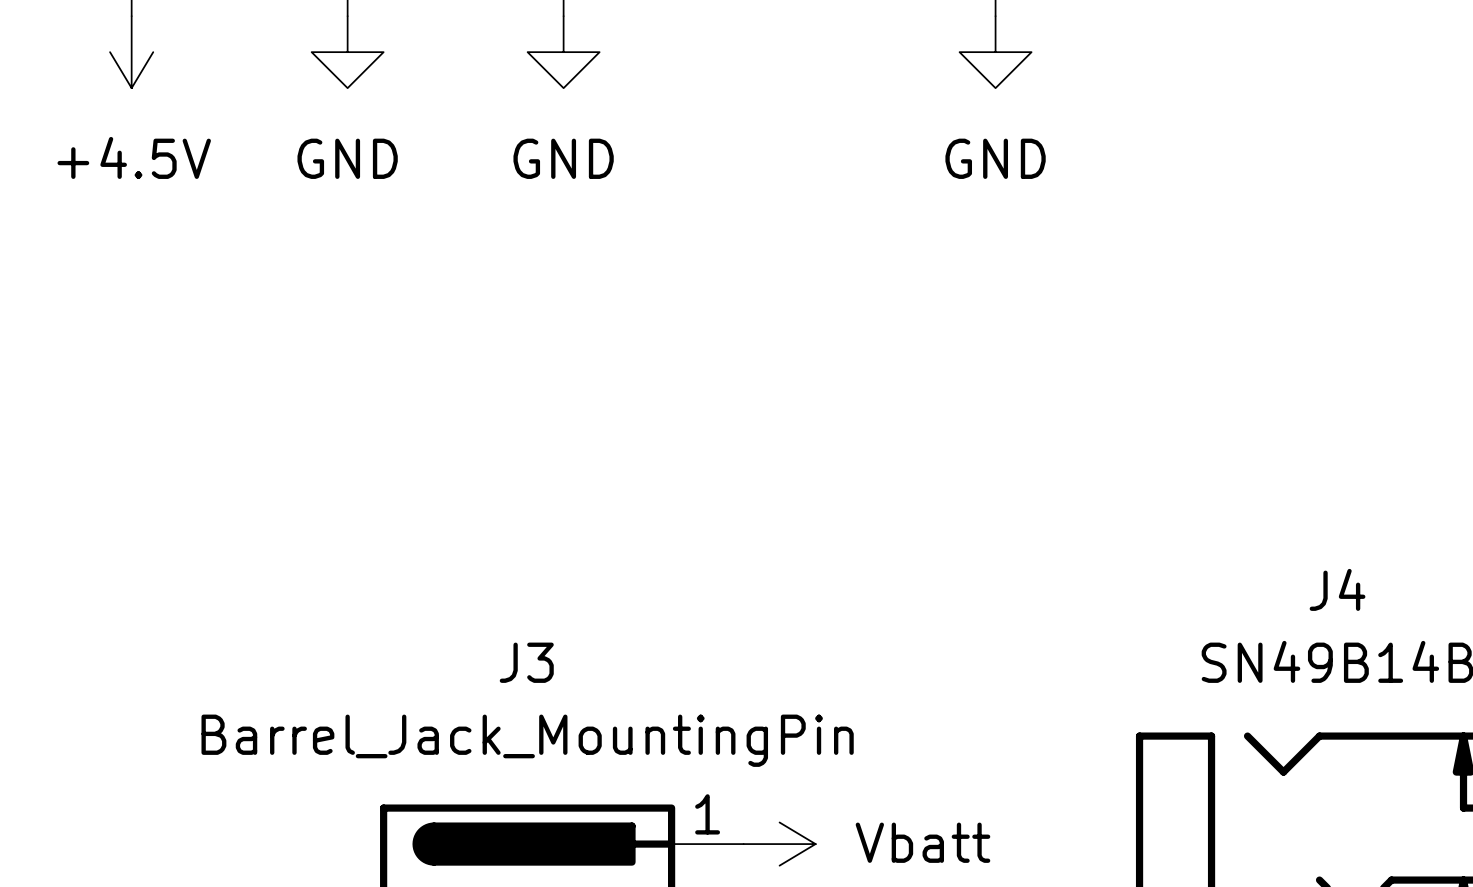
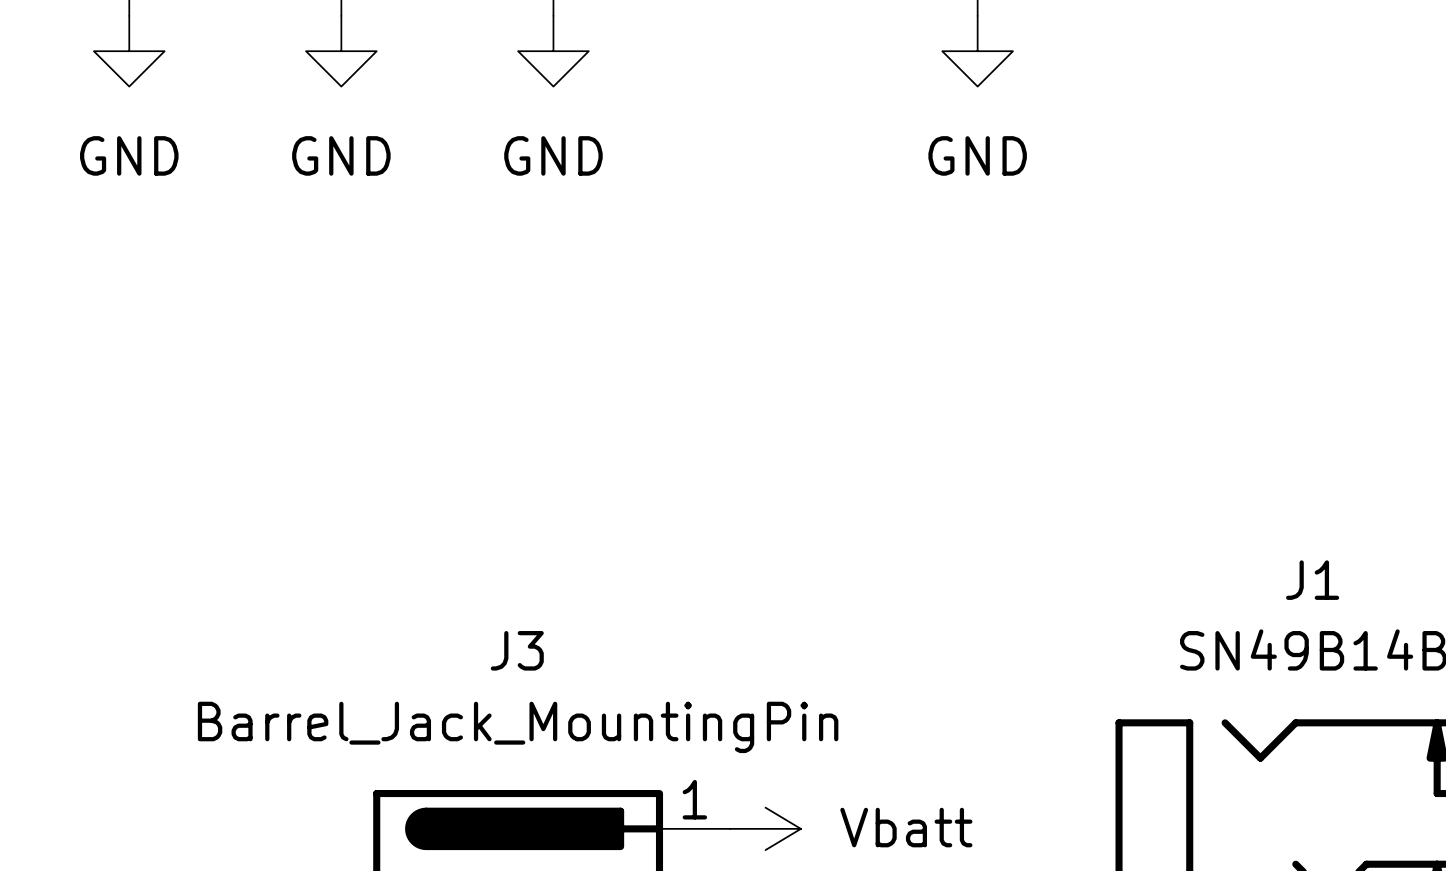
power symbol: +4.5V (131, 52) -> GND (129, 51)
J4 name: J4 (1337, 589) -> J1 (1312, 580)

